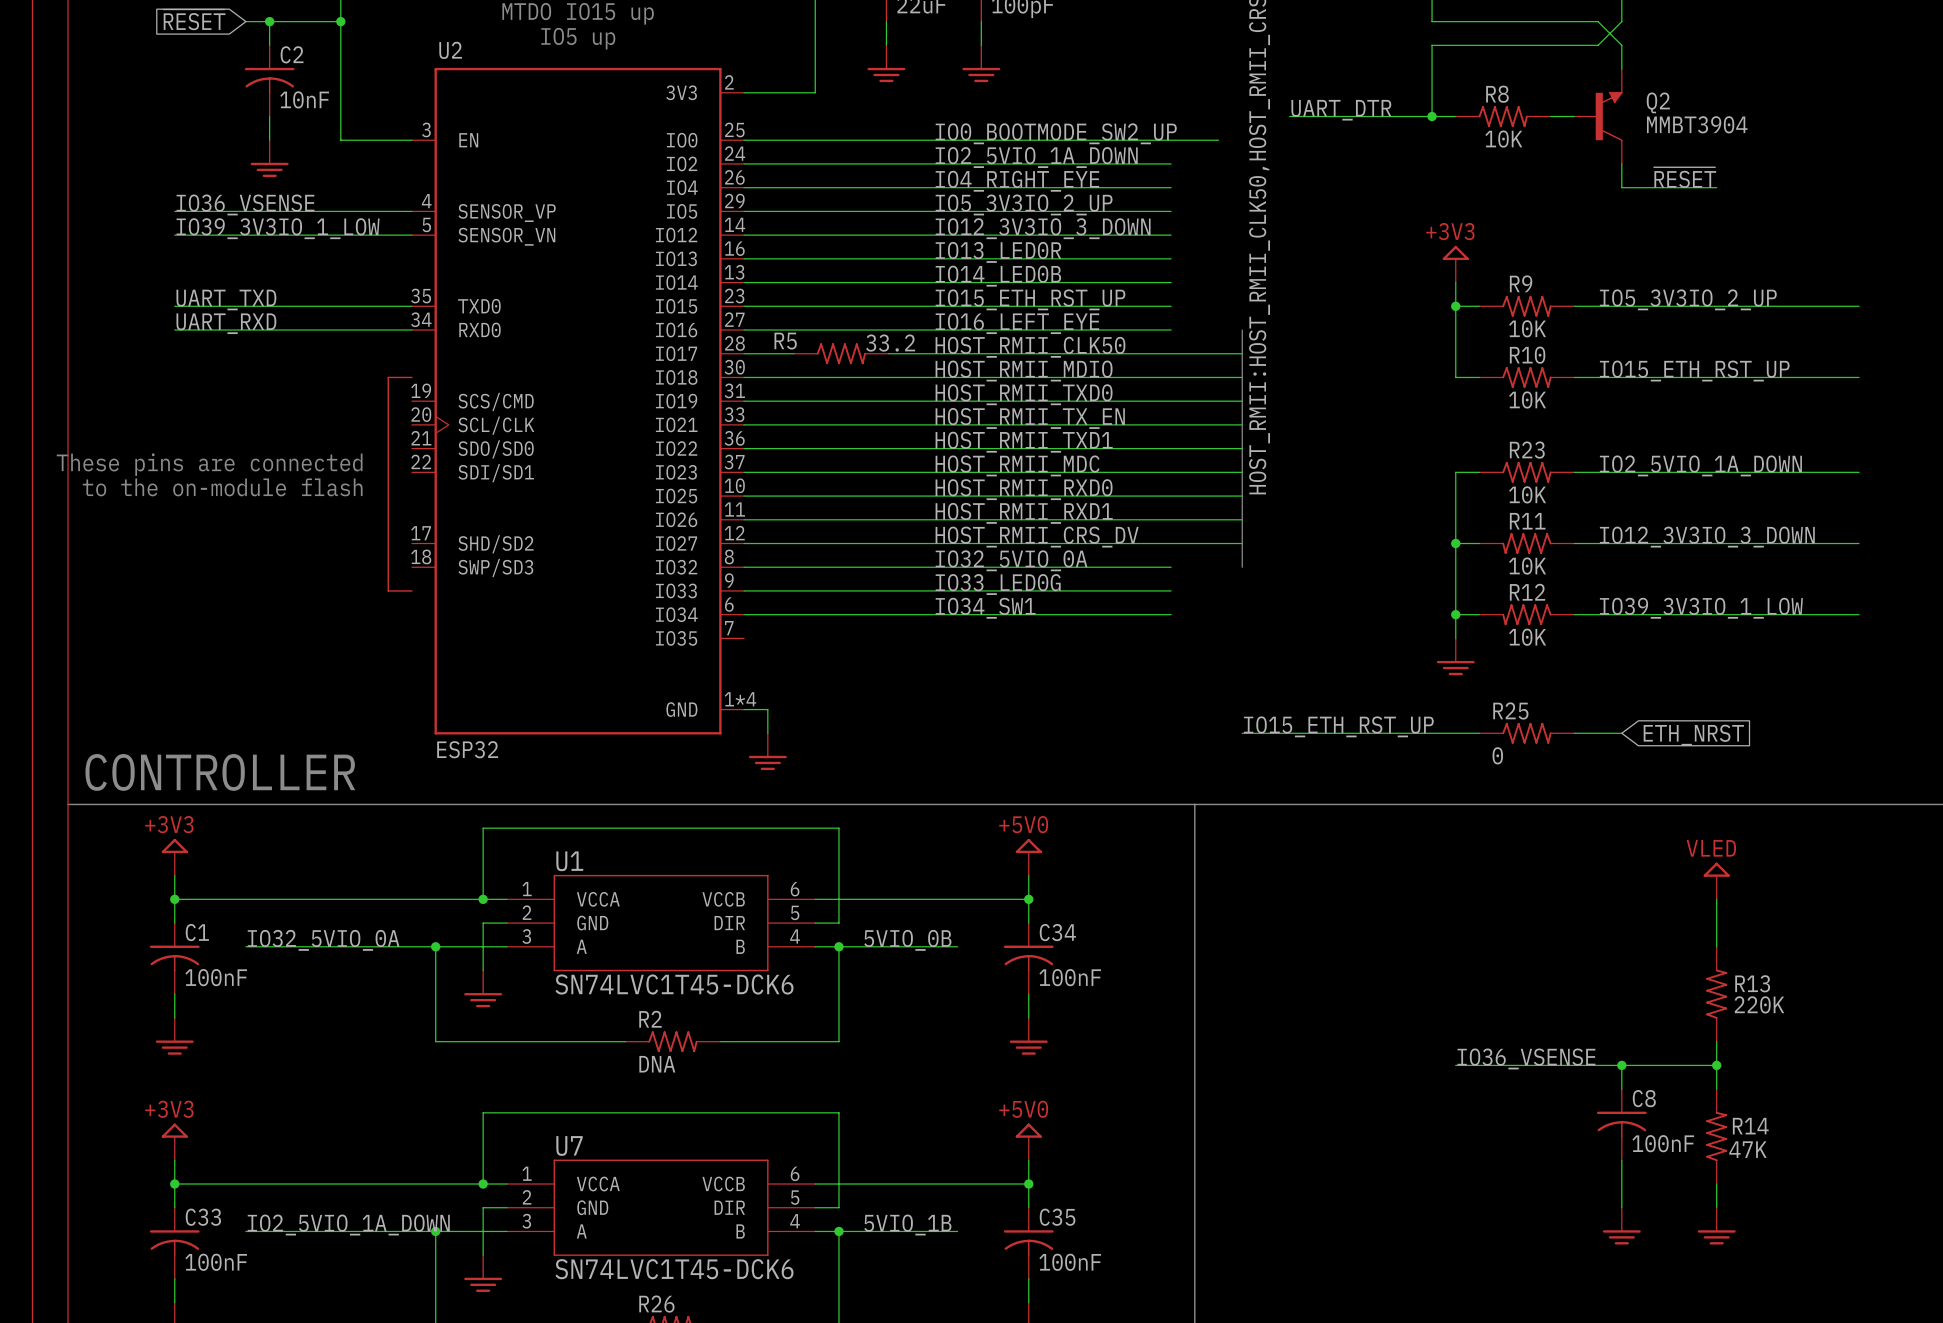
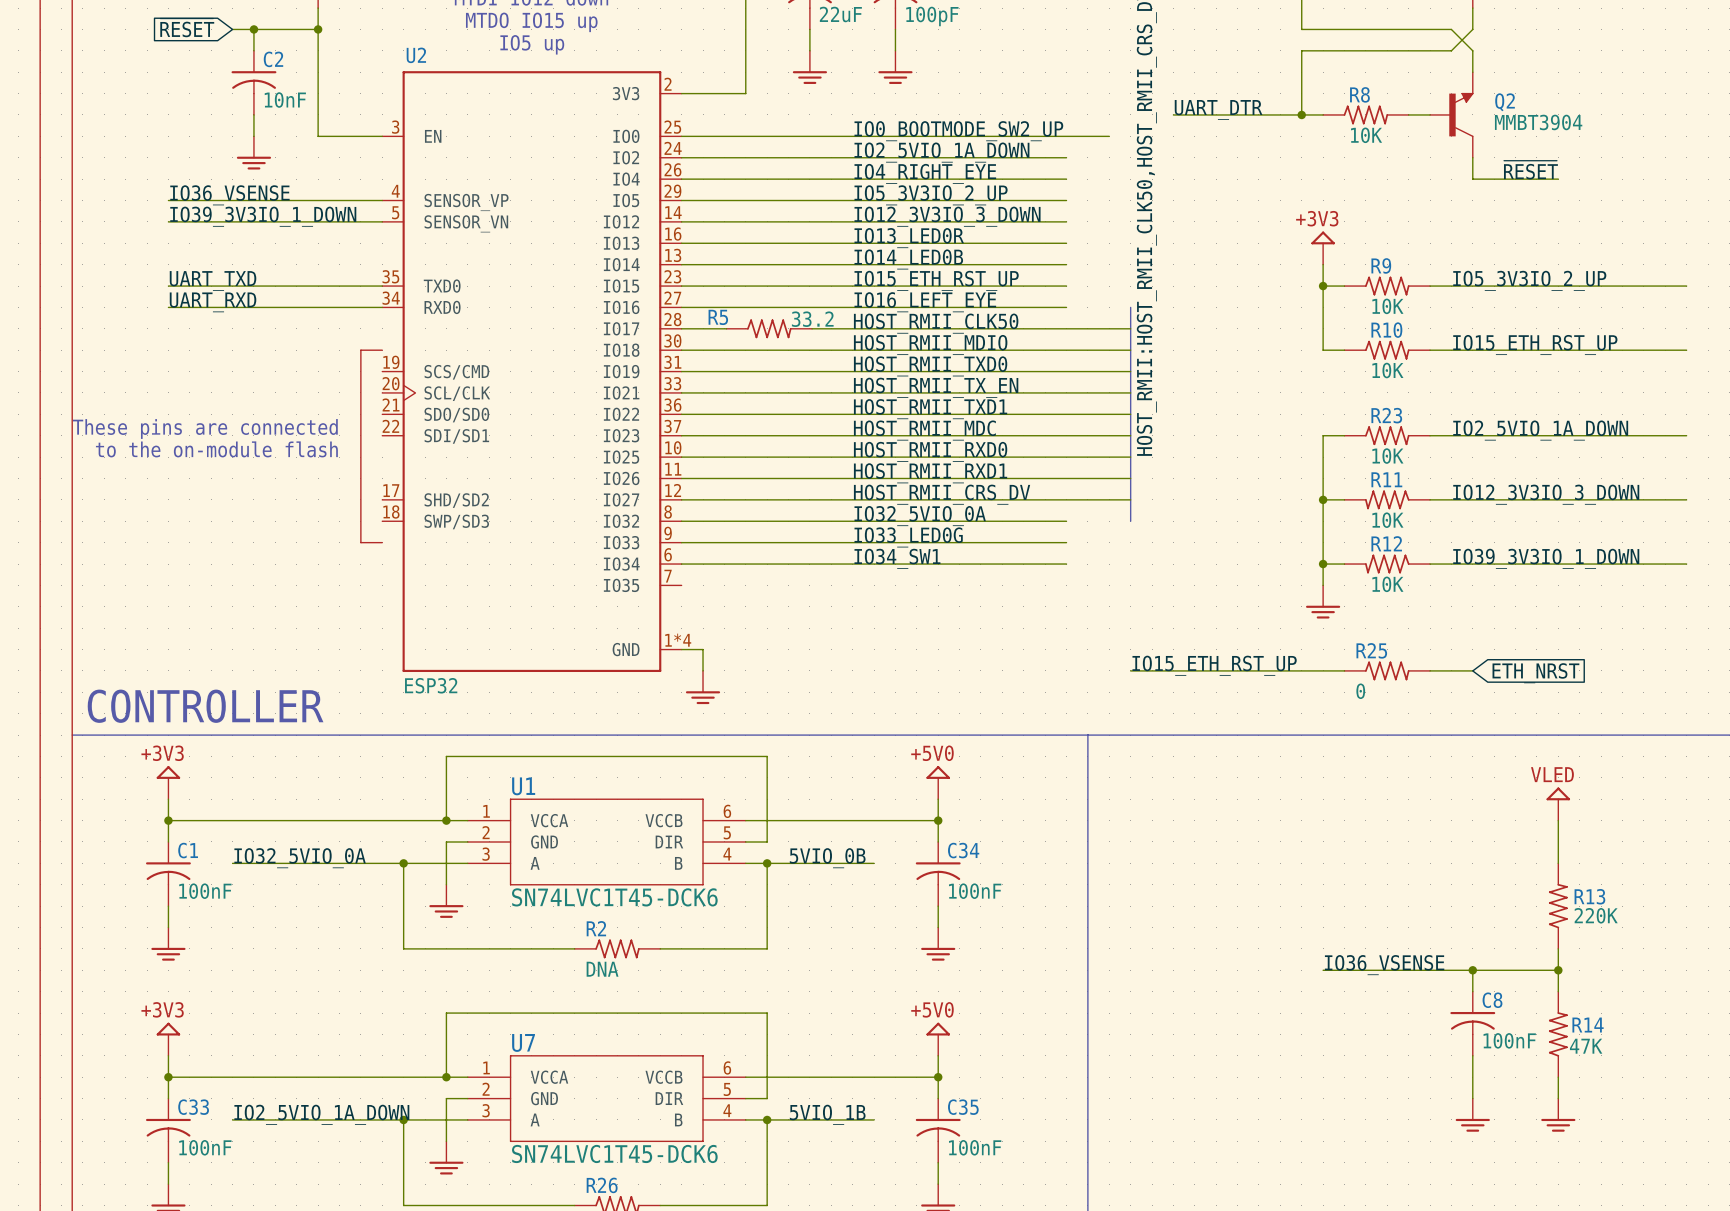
label: IO39_3V3IO_1_LOW (278, 228) -> IO39_3V3IO_1_DOWN (263, 216)
label: IO39_3V3IO_1_LOW (1701, 608) -> IO39_3V3IO_1_DOWN (1546, 558)

